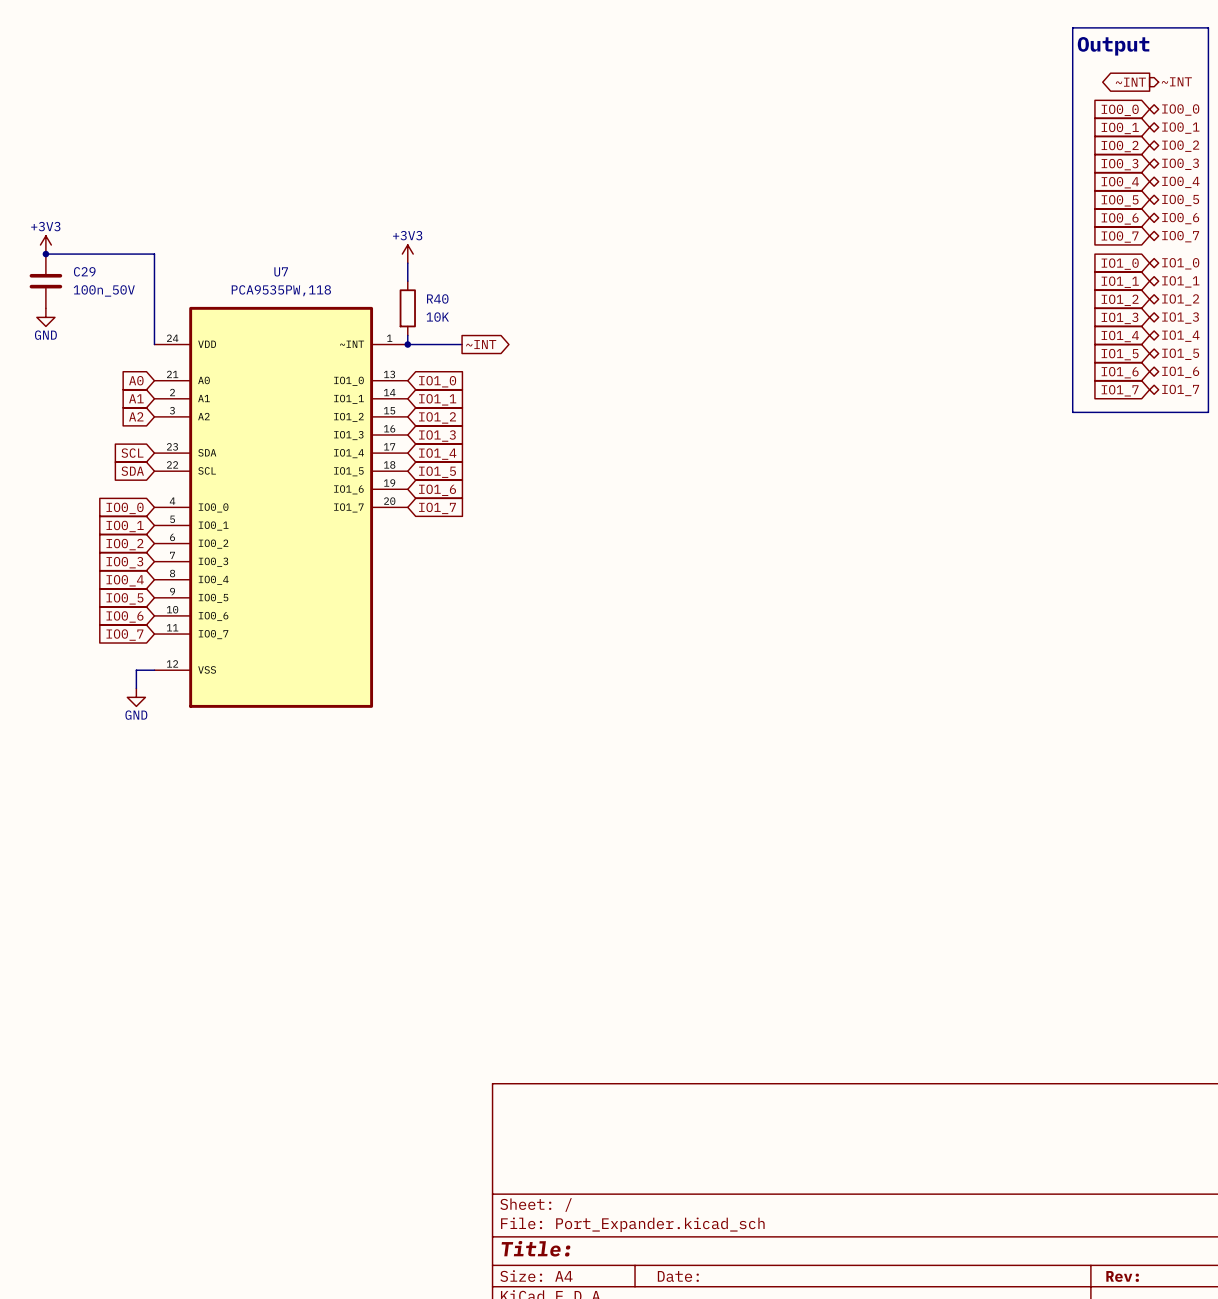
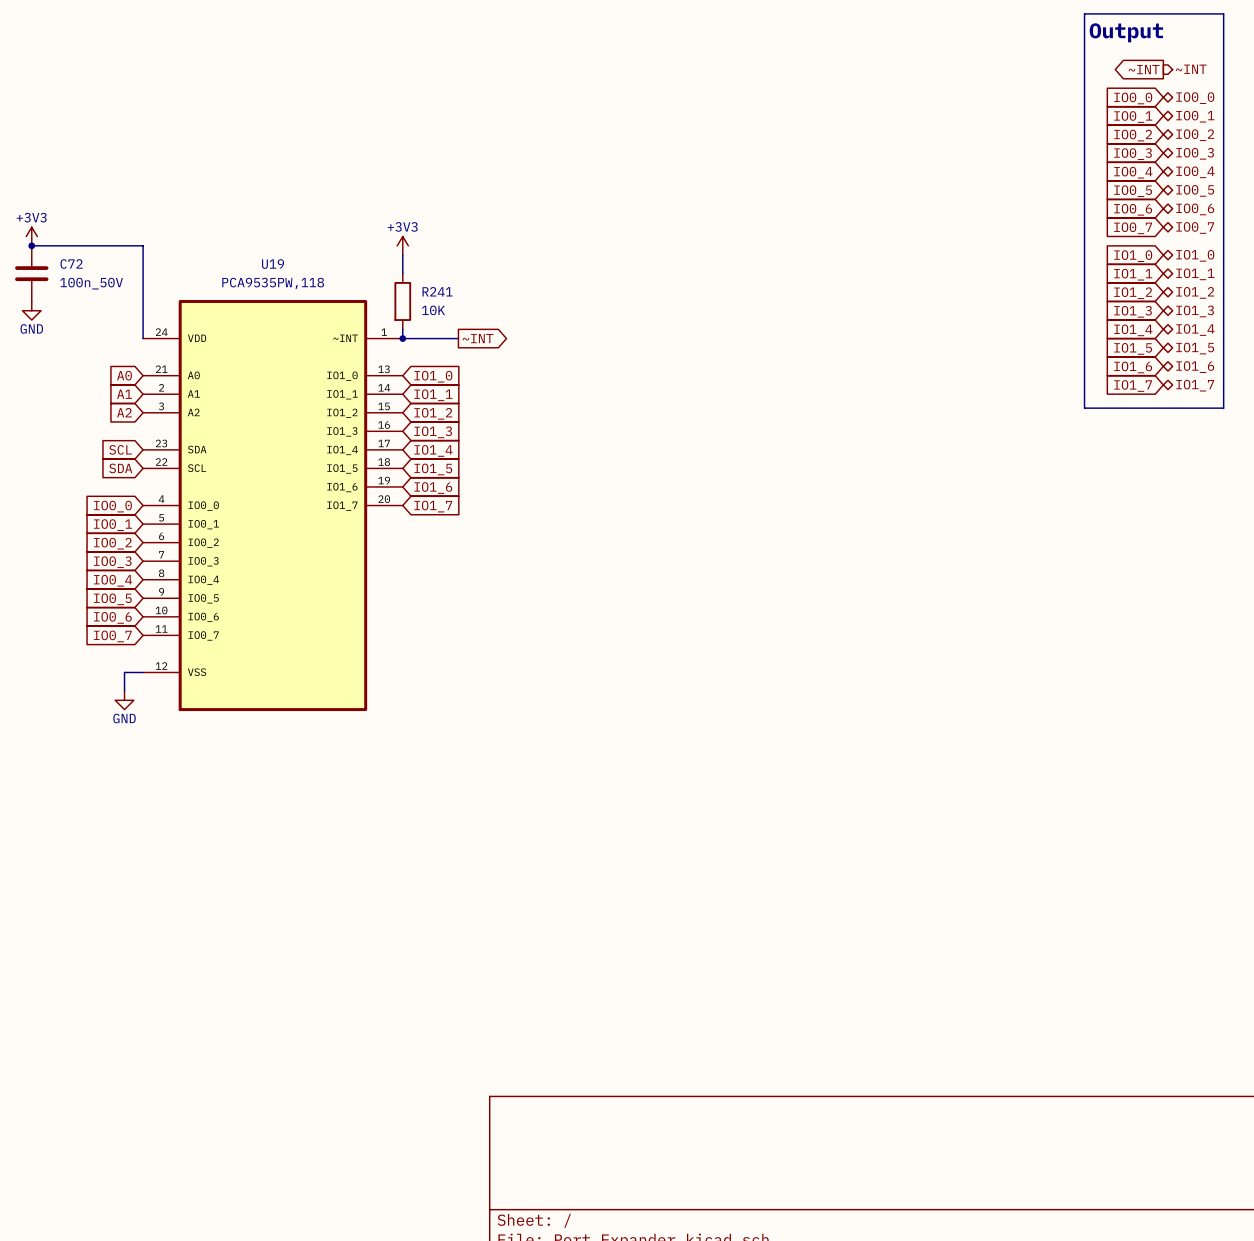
C29 name: C29 (84, 271) -> C72 (71, 264)
U7 name: U7 (281, 271) -> U19 (273, 264)
R40 name: R40 (437, 298) -> R241 (437, 291)

